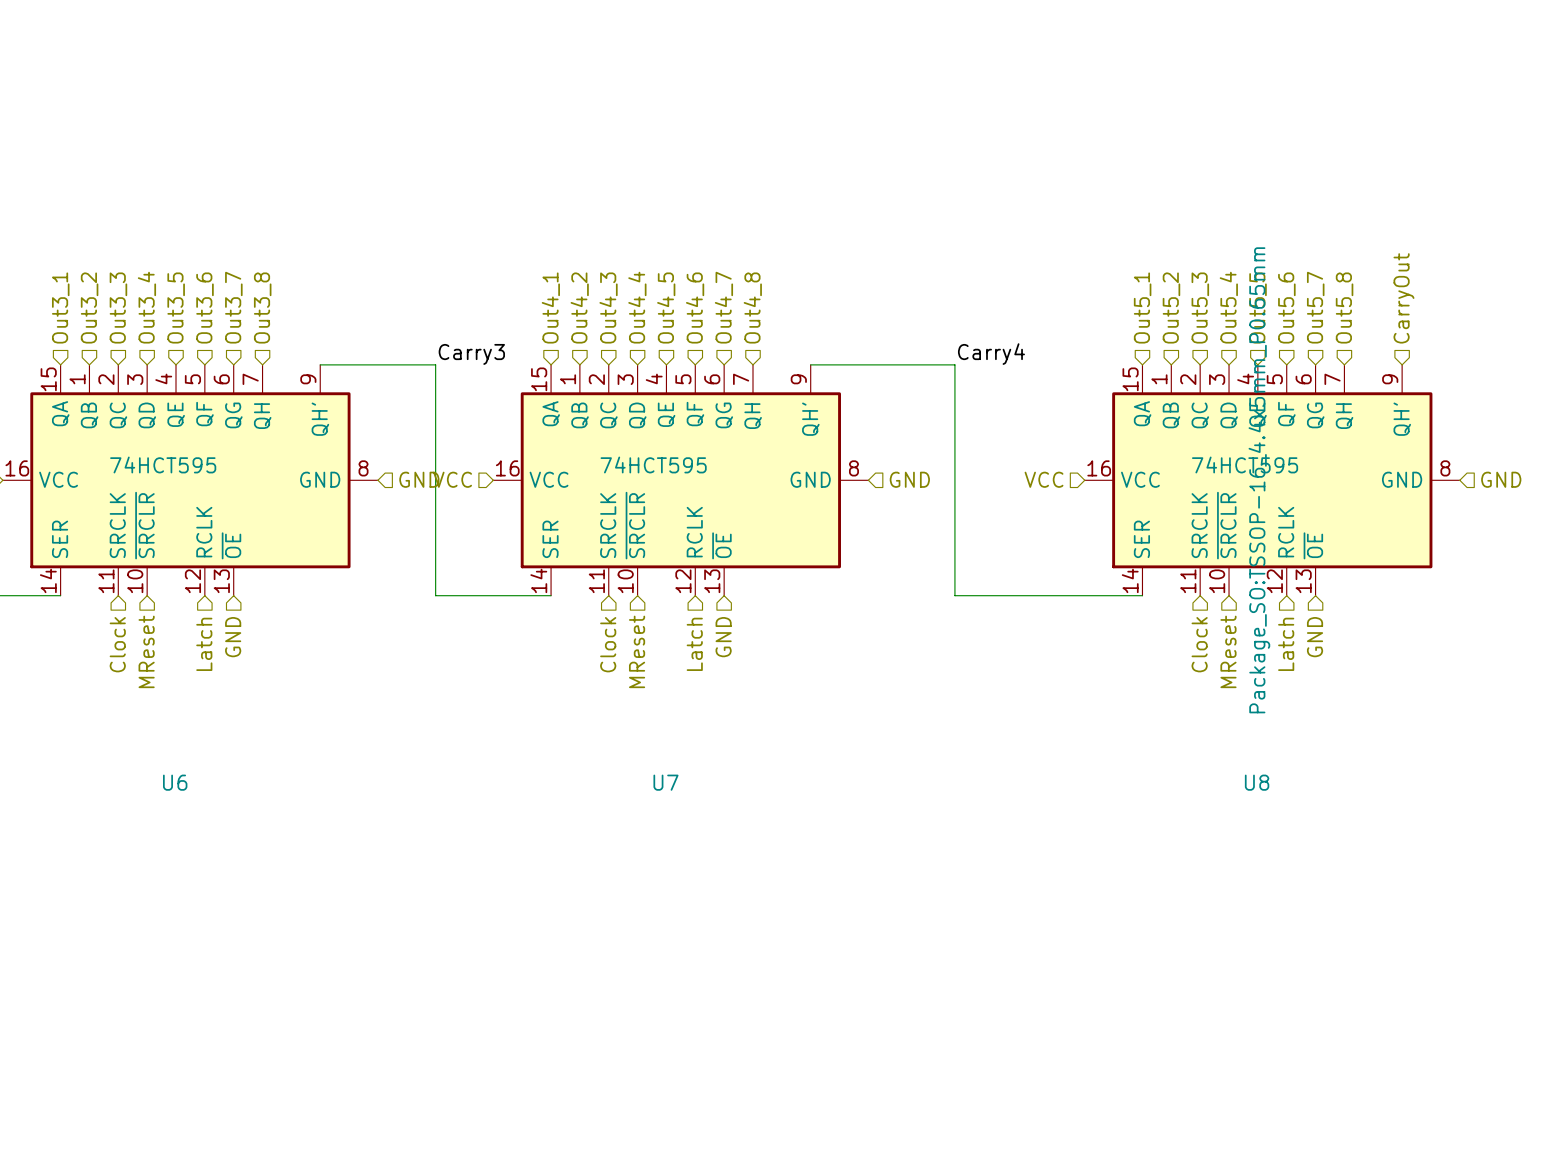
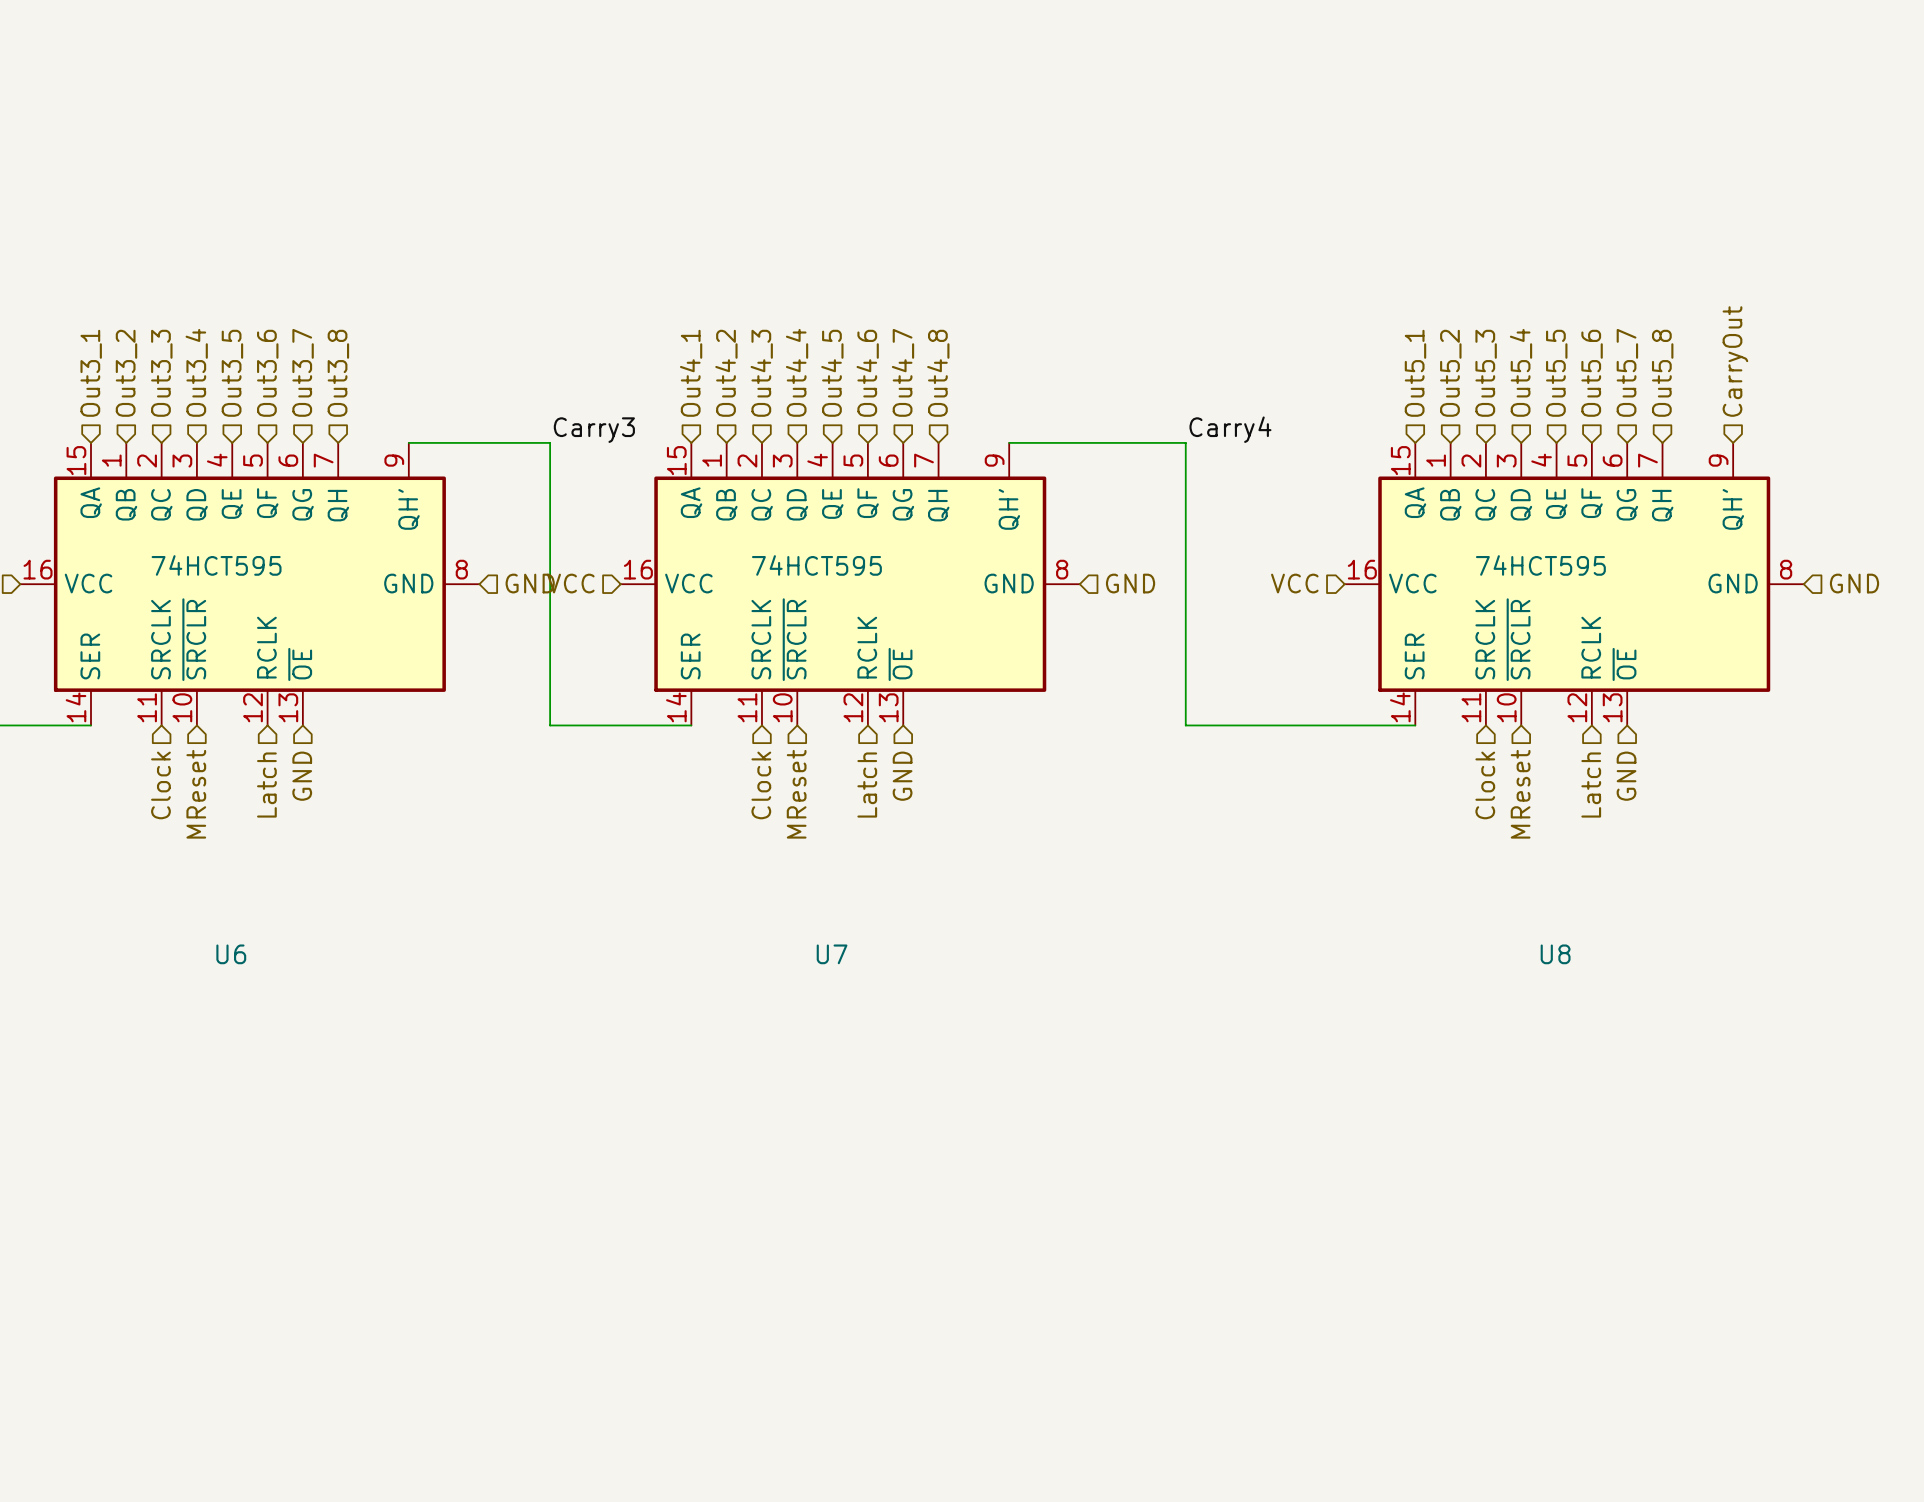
U8 text: Package_SO:TSSOP-16_4.4x5mm_P0.65mm (1259, 480) -> none

